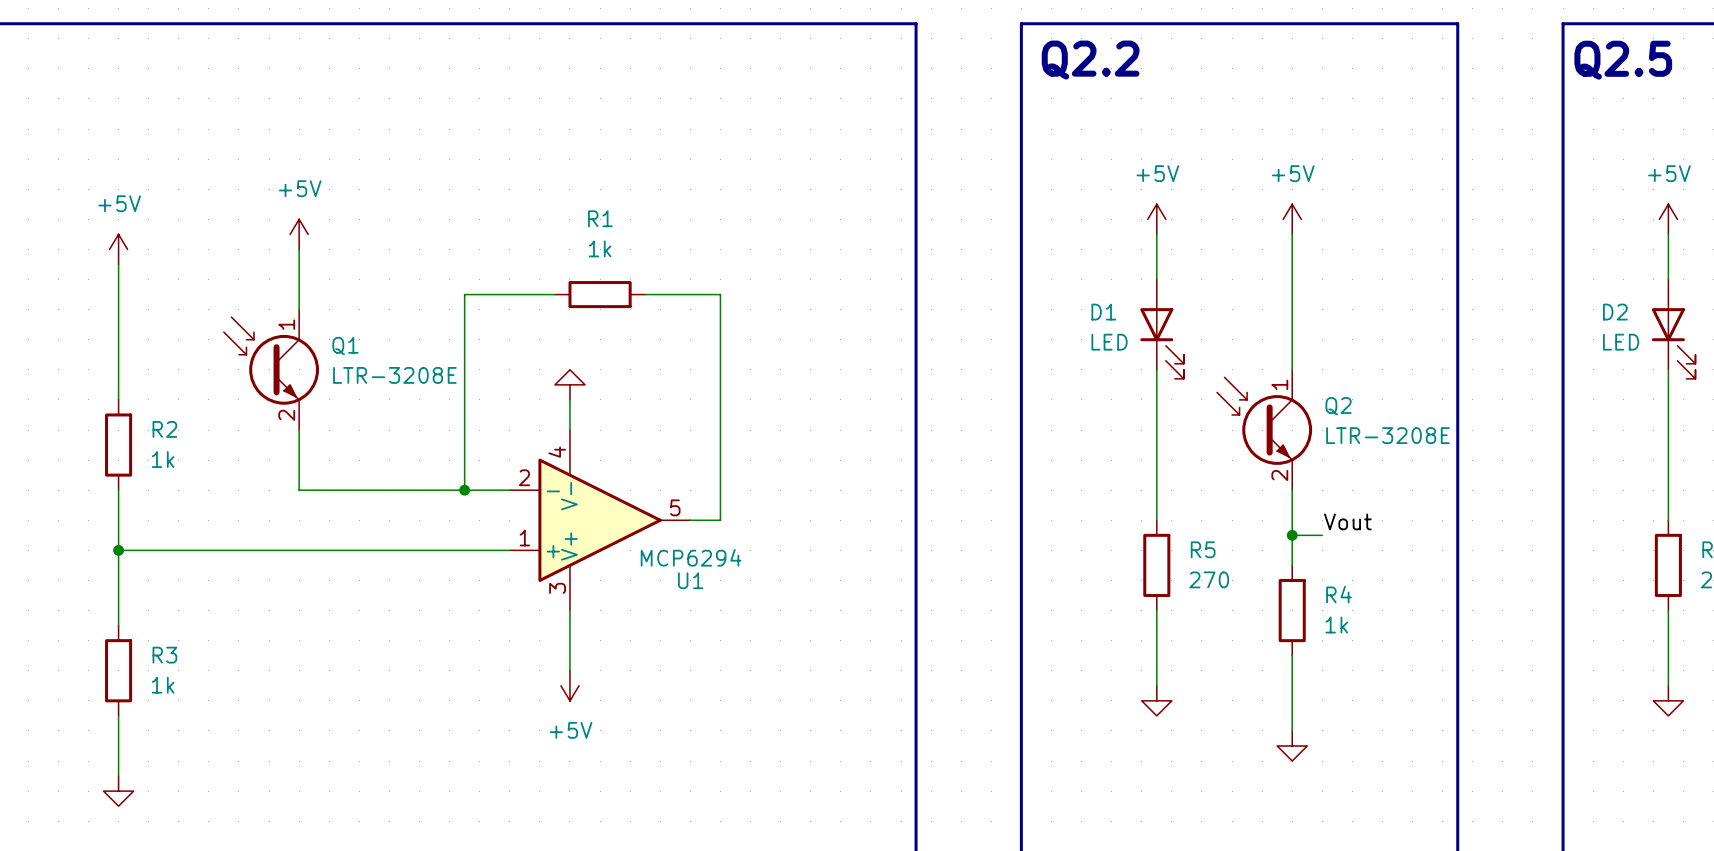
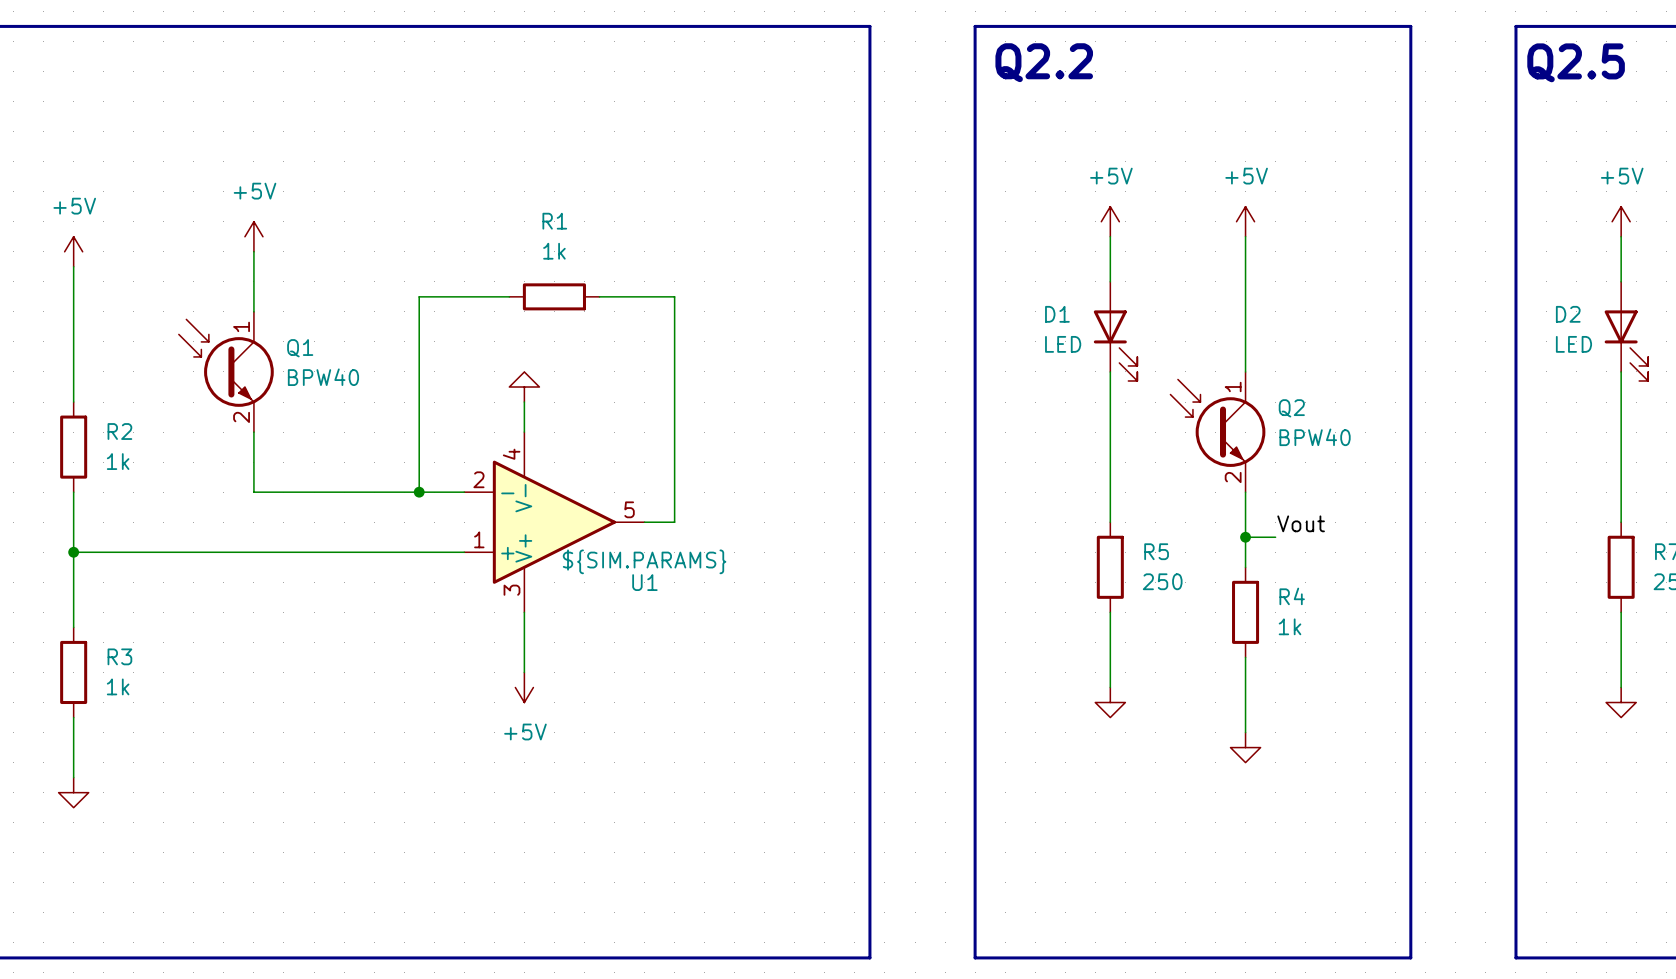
Q1 value: LTR-3208E (394, 375) -> BPW40 (323, 377)
Q2 value: LTR-3208E (1387, 435) -> BPW40 (1315, 437)
U1 value: MCP6294 (691, 557) -> ${SIM.PARAMS} (644, 561)
R5 value: 270 (1209, 579) -> 250 (1162, 581)

